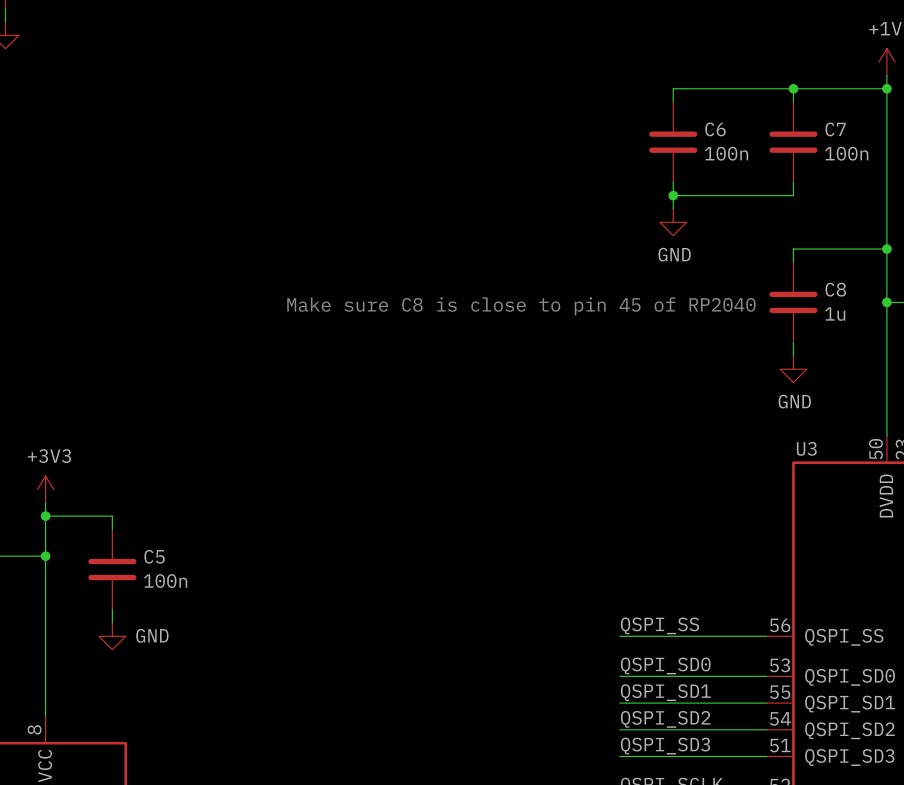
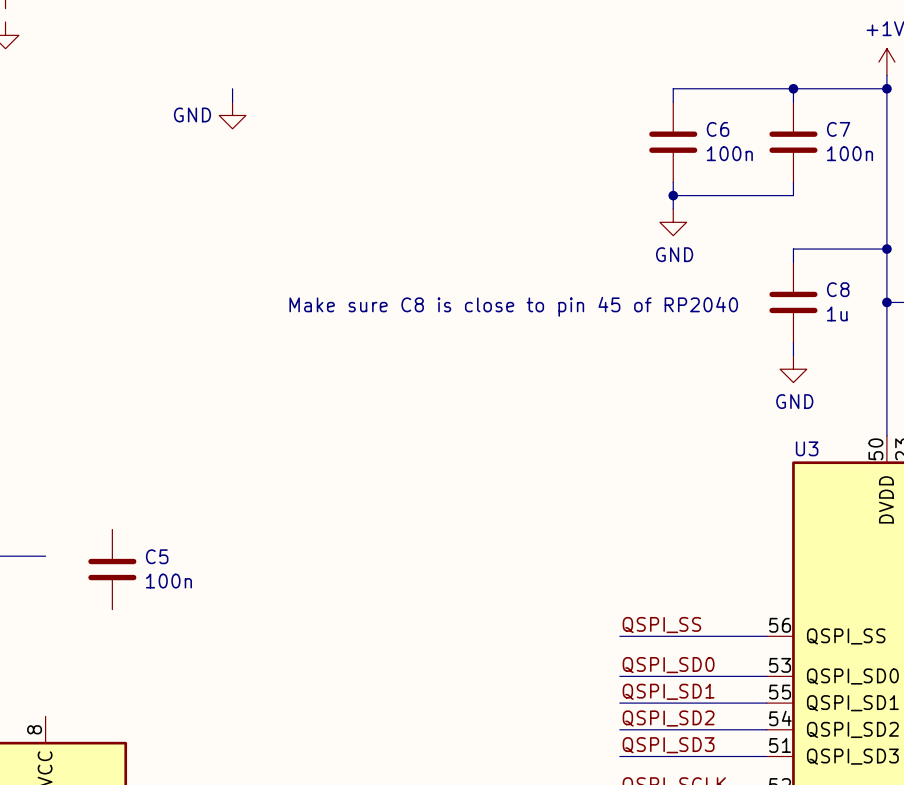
wire: (5, 8) (5, 22) -> (232, 88) (232, 102)
power symbol: none -> GND (232, 115)
power symbol: +3V3 (45, 489) -> none
wire: (45, 502) (45, 716) -> none
wire: (45, 516) (112, 516) (112, 529) -> none
junction: (45, 516) -> none
junction: (45, 556) -> none
wire: (112, 609) (112, 622) -> none
power symbol: GND (112, 636) -> none

